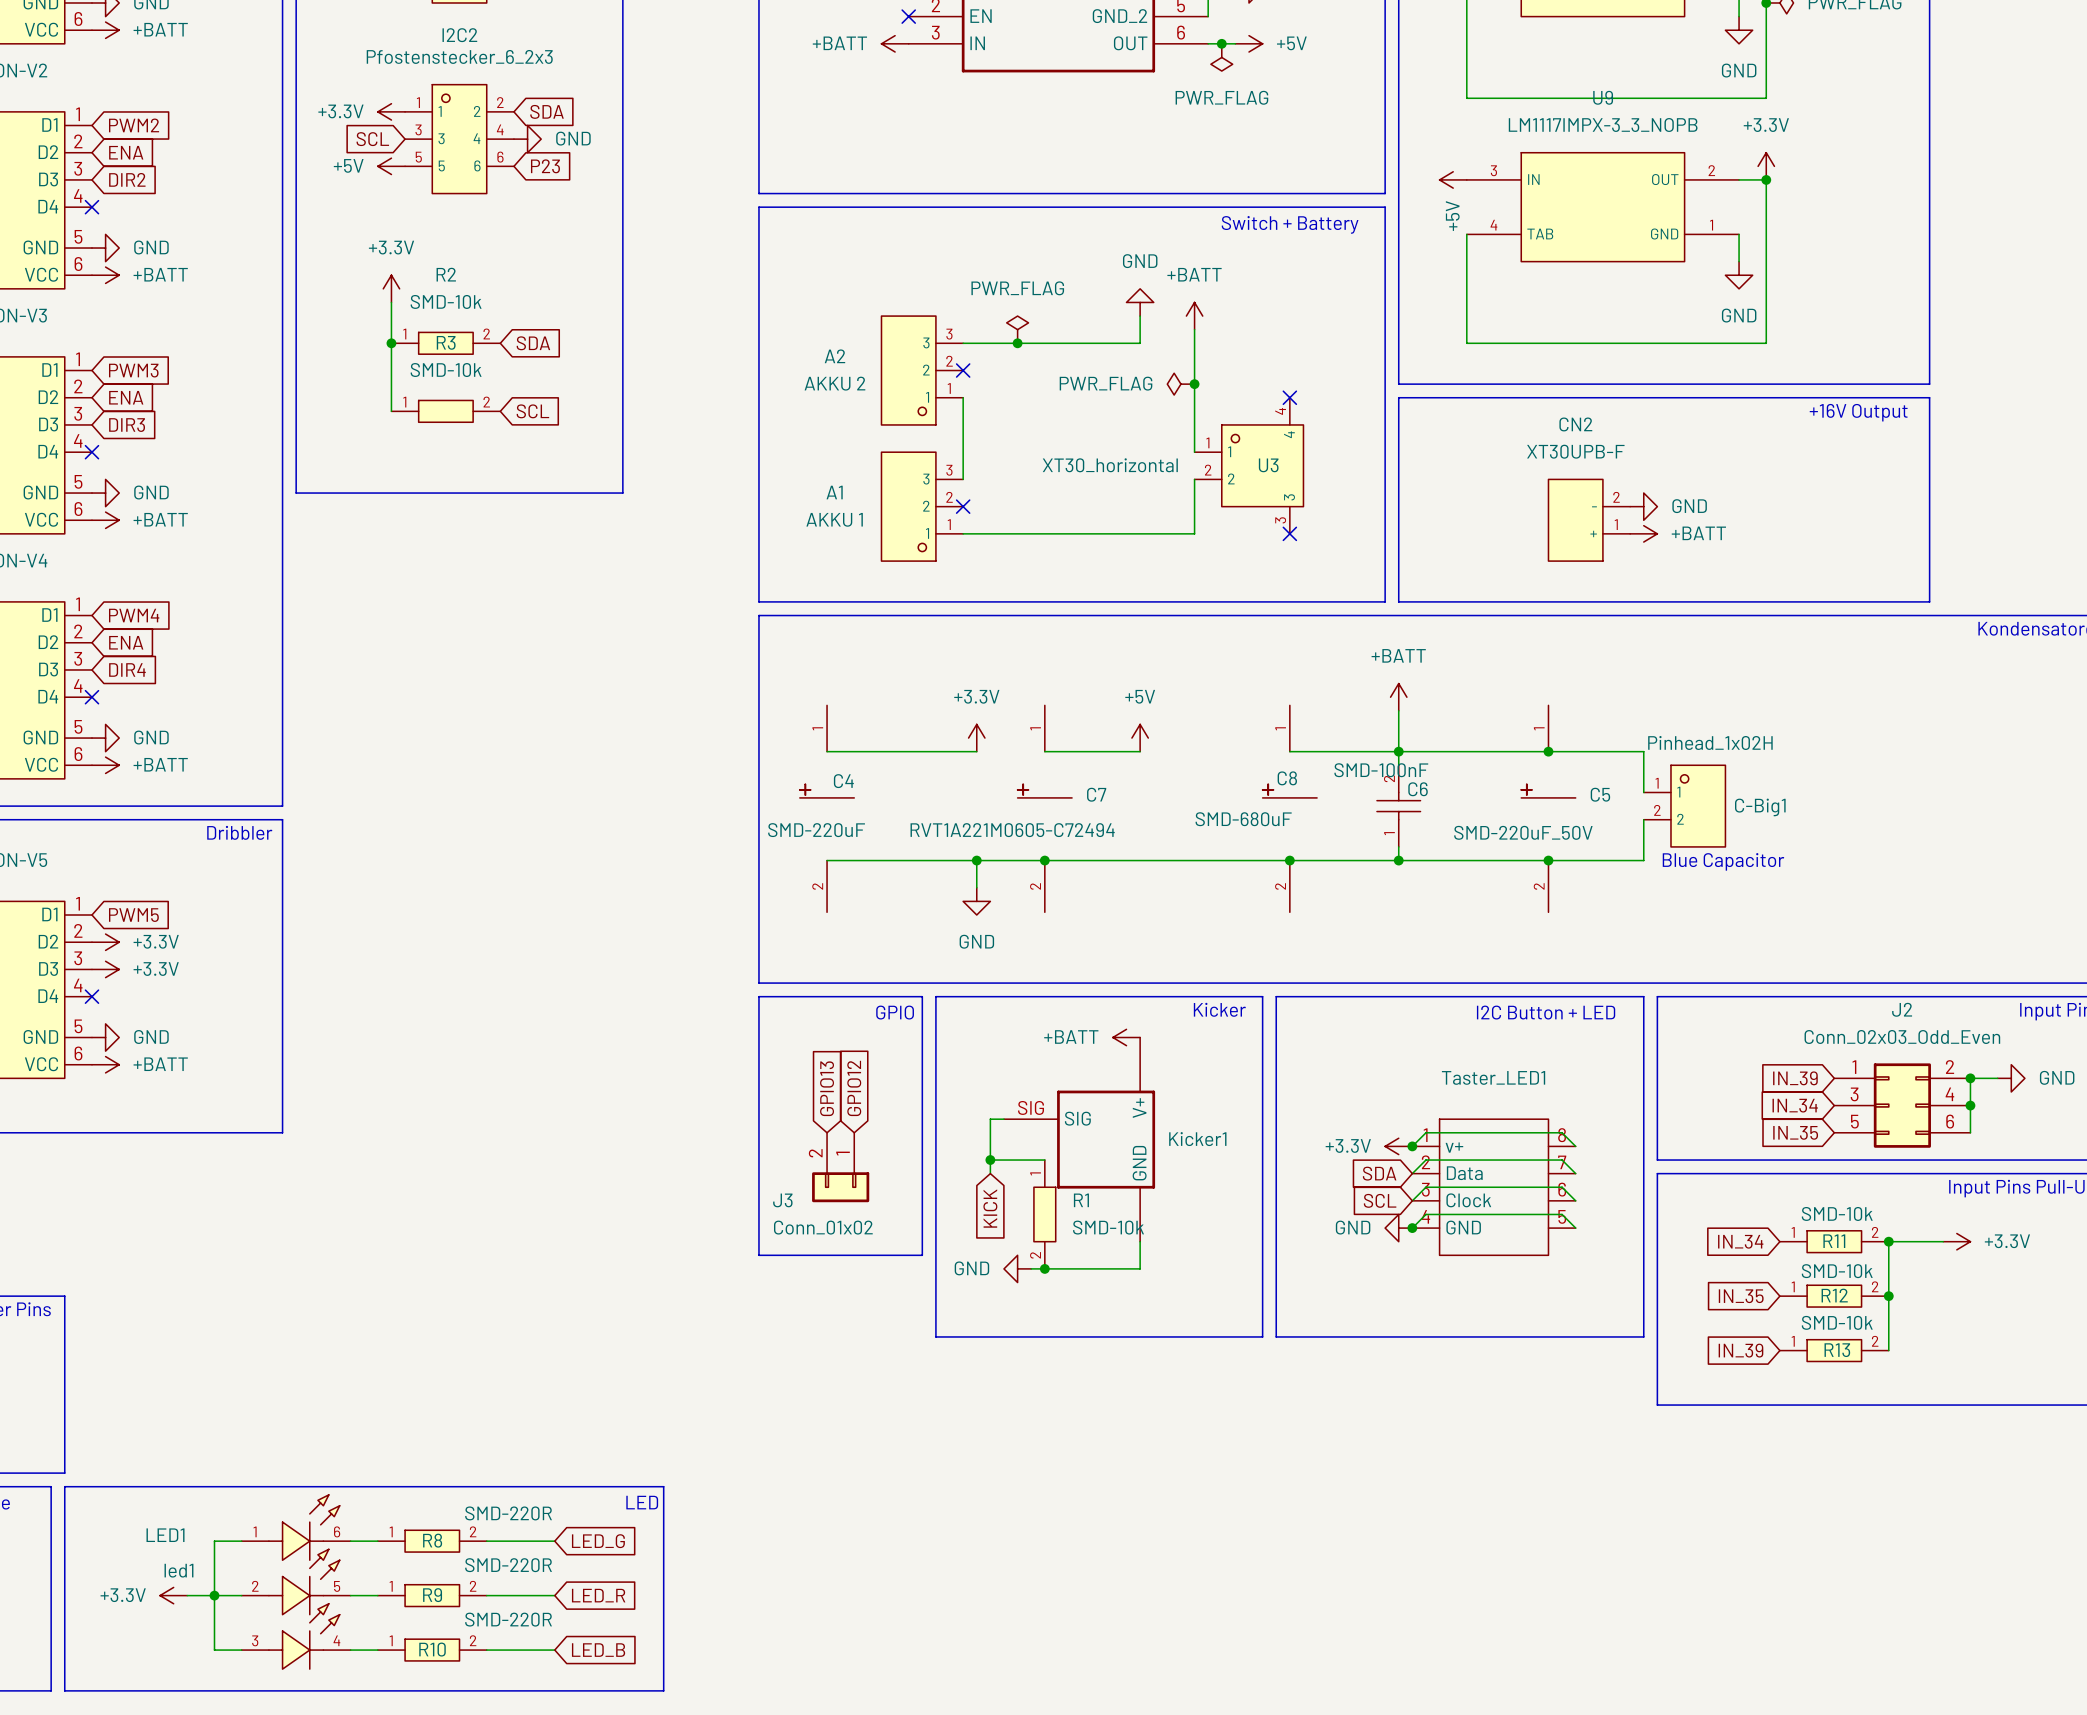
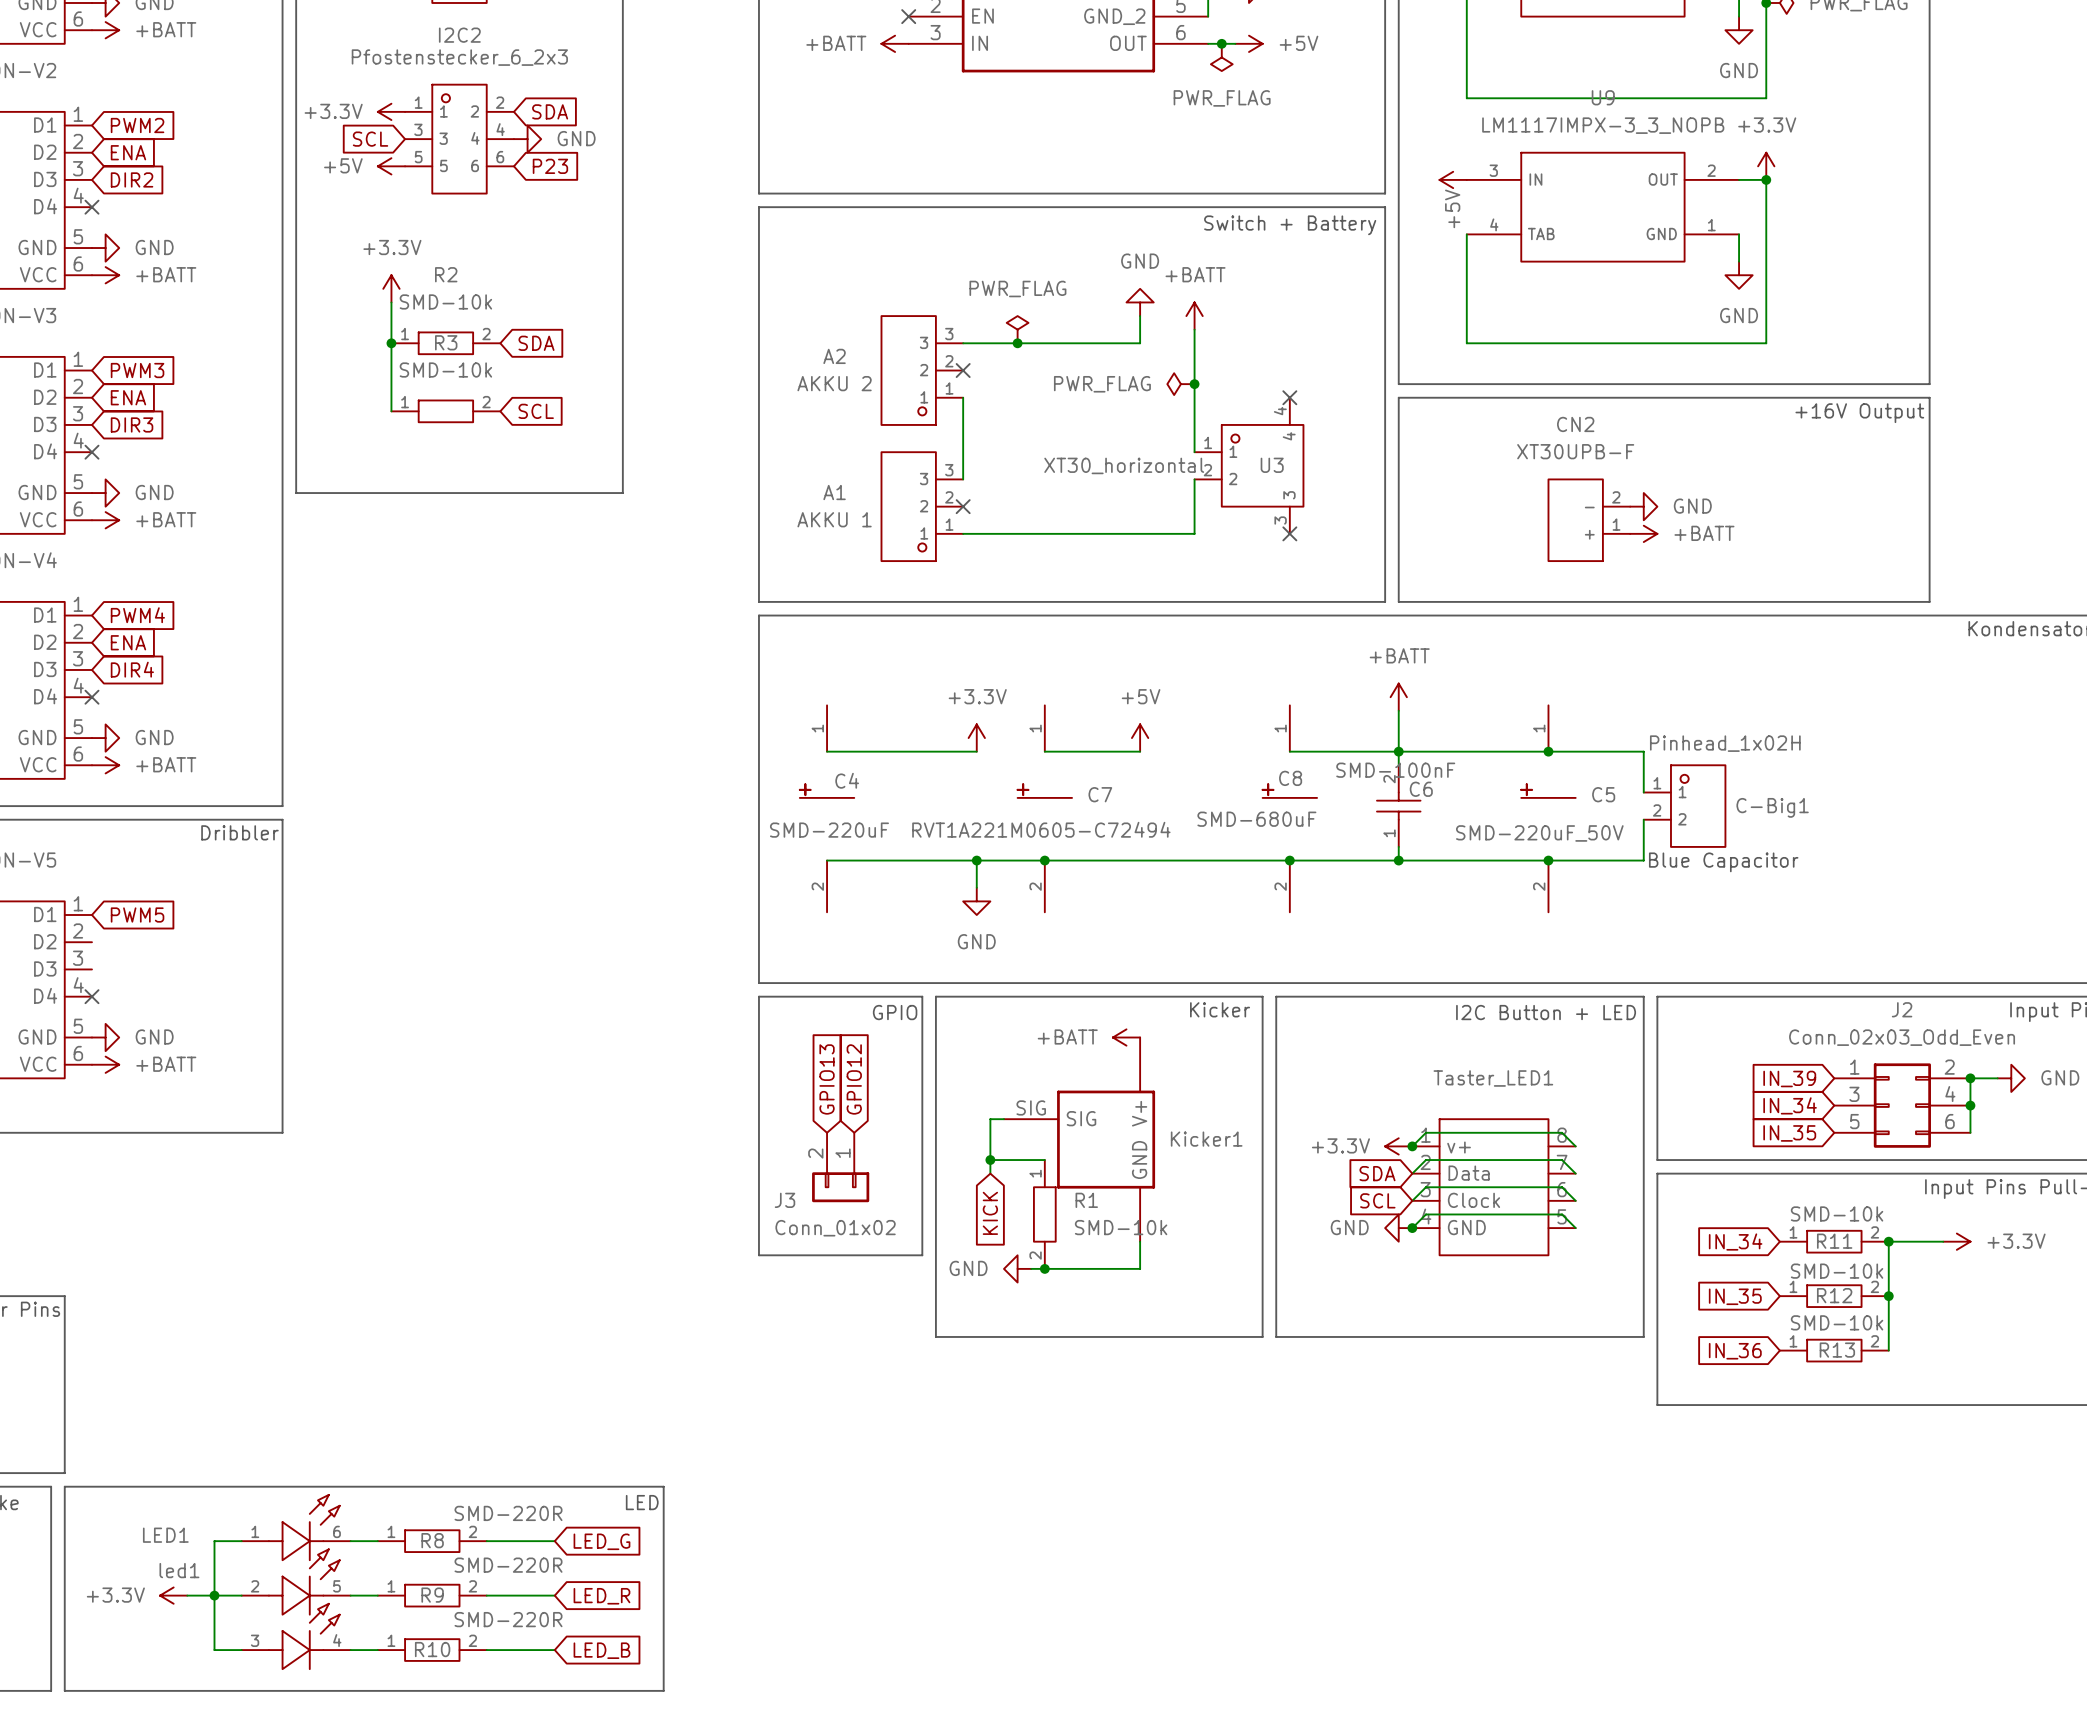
power symbol: +3.3V (105, 942) -> none
power symbol: +3.3V (105, 969) -> none
global label: IN_39 (1740, 1350) -> IN_36 (1735, 1351)

